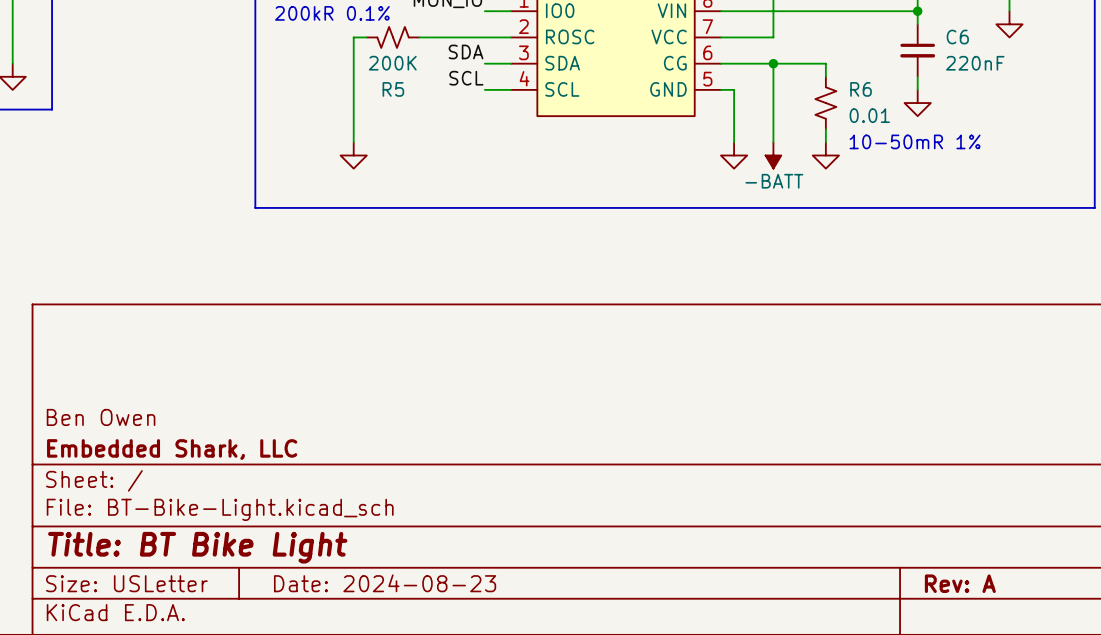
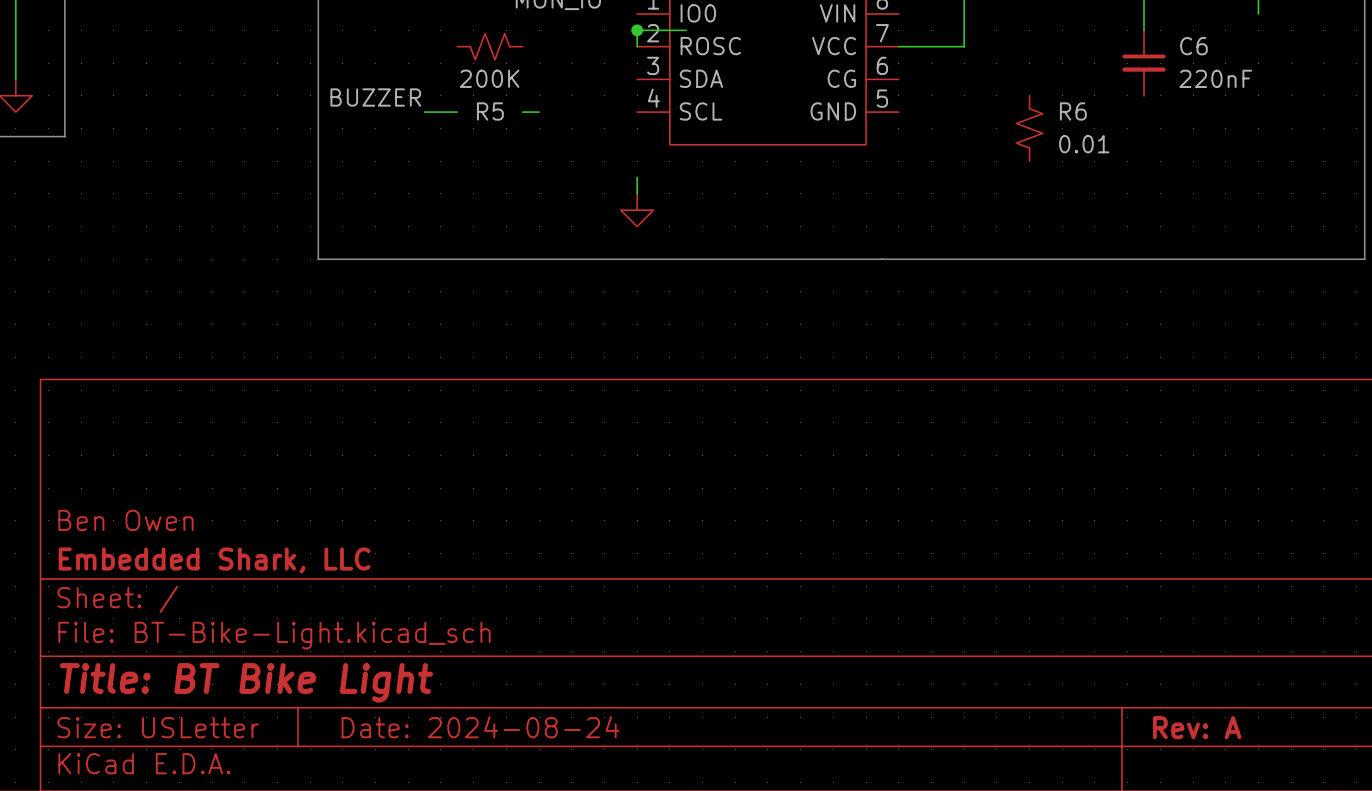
wire: (484, 11) (511, 11) -> none
wire: (720, 11) (917, 11) -> none
junction: (917, 11) -> none
text: 200kR 0.1% (332, 13) -> none
junction: none -> (637, 30)
power symbol: (1009, 24) -> none
wire: (366, 37) (353, 37) (353, 142) -> none
wire: (419, 37) (511, 37) -> (686, 30) (637, 30) (637, 46)
label: SDA (466, 51) -> none
wire: (484, 63) (511, 63) -> none
wire: (720, 63) (825, 63) (825, 76) -> none
wire: (773, 63) (773, 142) -> none
junction: (773, 63) -> none
wire: (917, 76) (917, 89) -> none
label: none -> BUZZER (375, 97)
label: SCL (466, 78) -> none
wire: none -> (522, 112) (539, 112)
wire: (484, 89) (511, 89) -> (424, 112) (457, 112)
wire: (720, 89) (734, 89) (734, 142) -> none
power symbol: (917, 103) -> none
wire: (825, 129) (825, 142) -> none
text: 10-50mR 1% (915, 141) -> none
wire: none -> (637, 177) (637, 193)
power symbol: (353, 155) -> none
power symbol: (734, 155) -> none
power symbol: -BATT (773, 155) -> none
power symbol: (825, 155) -> none
power symbol: none -> (637, 210)
title block: Date: 2024-08-23 (385, 583) -> Date: 2024-08-24 (480, 727)

